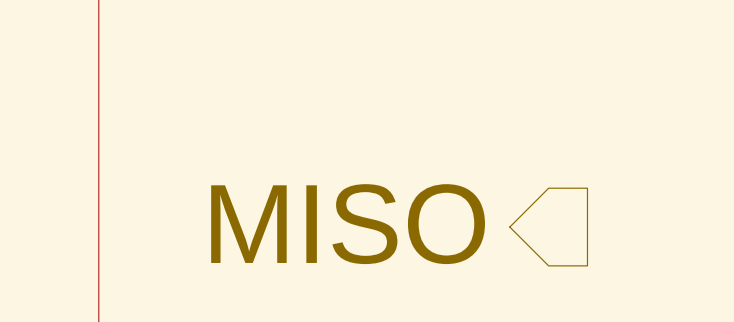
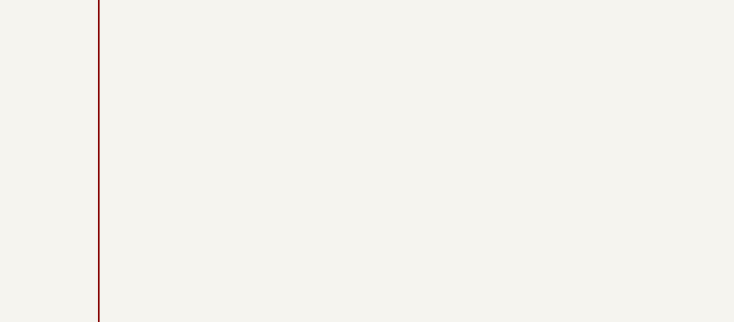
hierarchical label: MISO (348, 224) -> none

